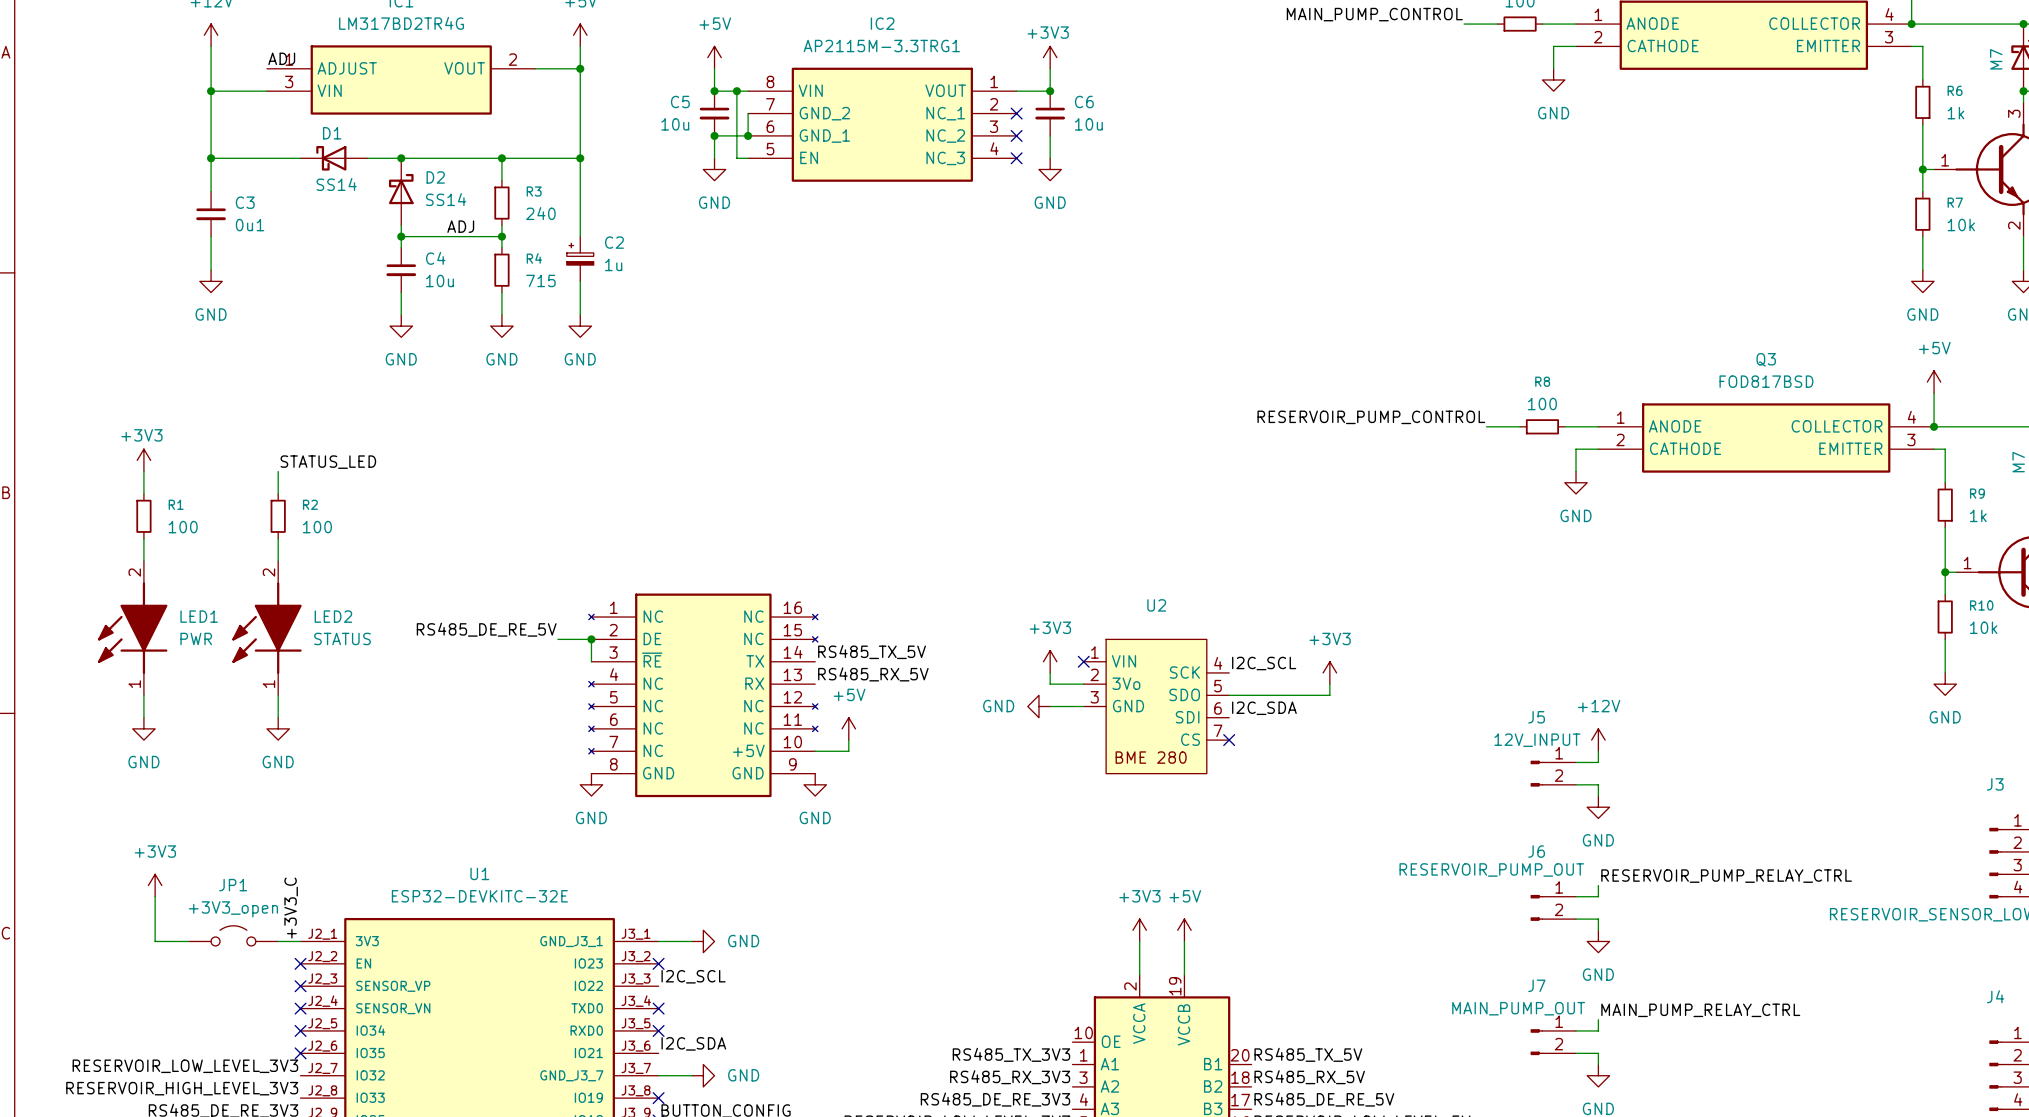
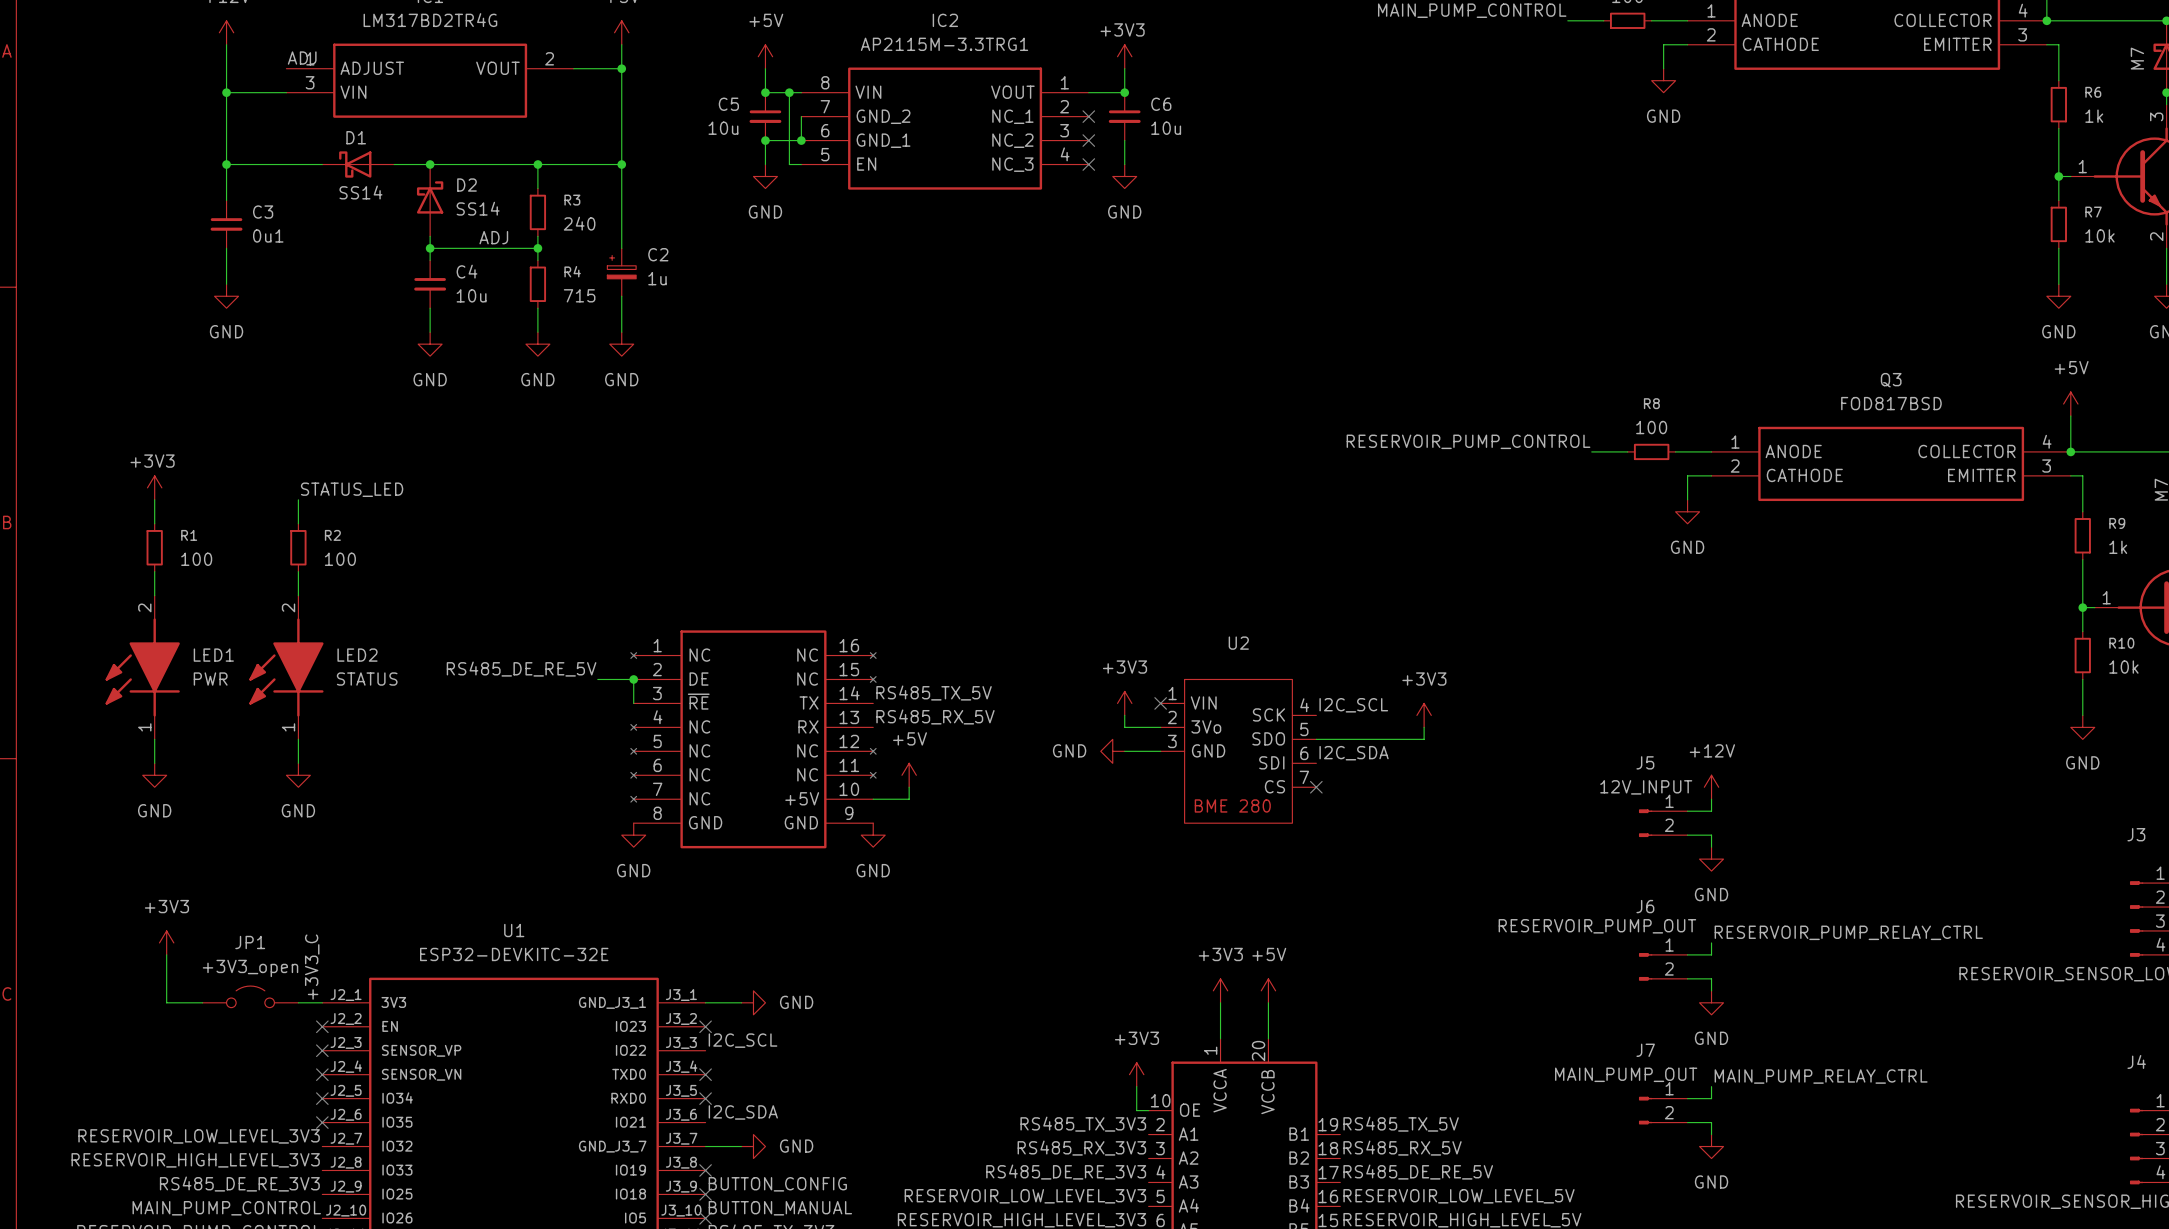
part pin number: 2 (1130, 986) -> 1 (1210, 1050)
part pin number: 19 (1175, 986) -> 20 (1258, 1051)
power symbol: none -> +3V3 (1136, 1074)
wire: none -> (1136, 1086) (1136, 1110) (1148, 1110)
part pin number: 1 (1083, 1055) -> 2 (1160, 1124)
part pin number: 20 (1240, 1055) -> 19 (1328, 1124)

